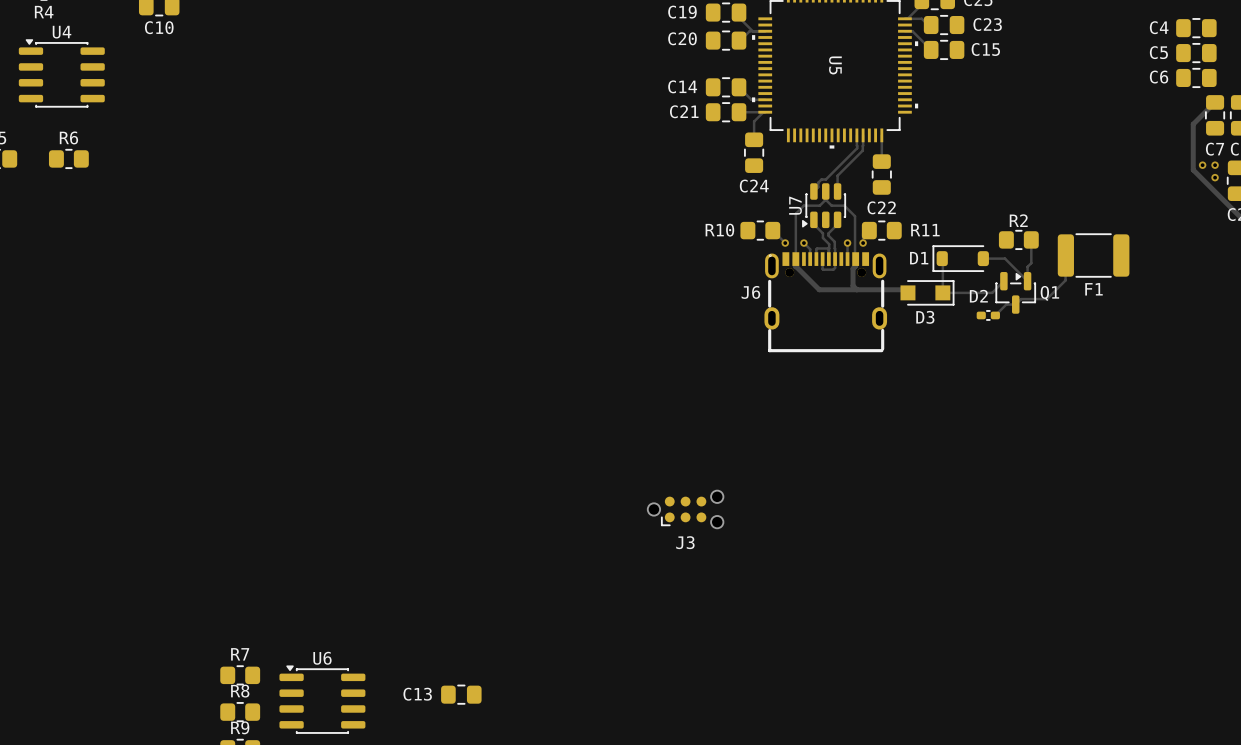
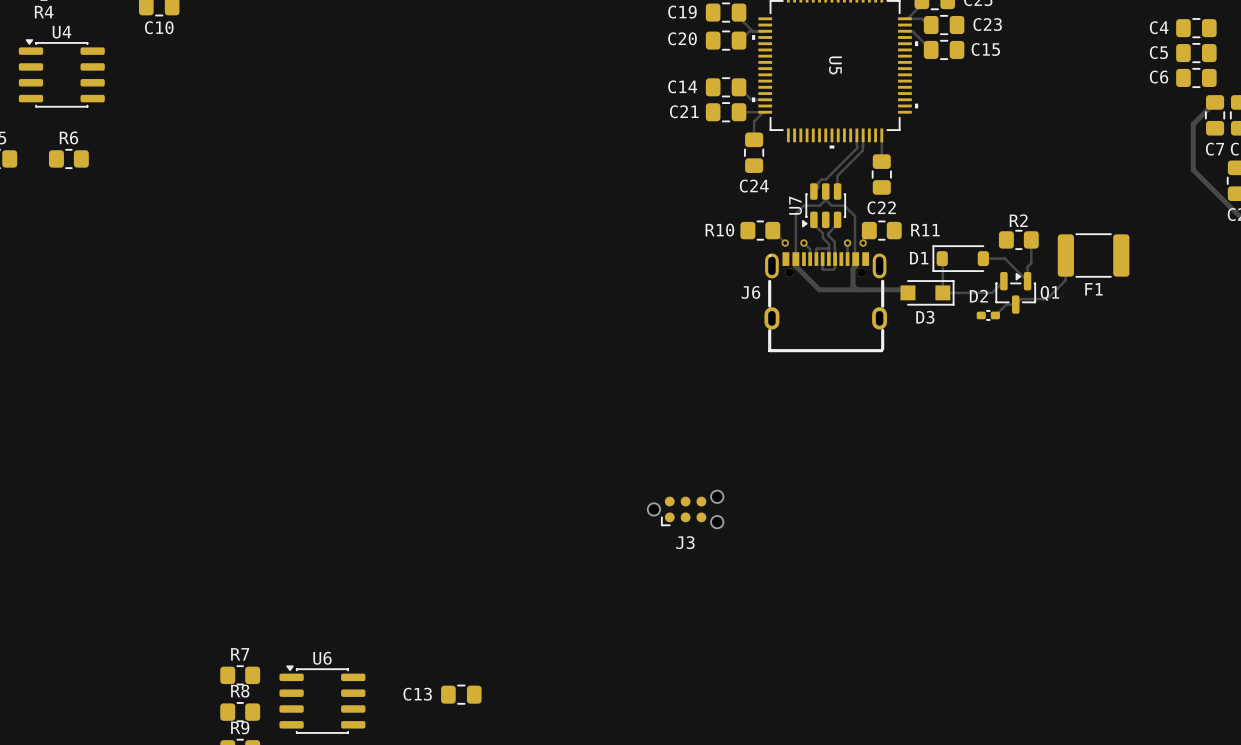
via: (1202, 165) -> none
via: (1215, 165) -> none
via: (1215, 177) -> none

